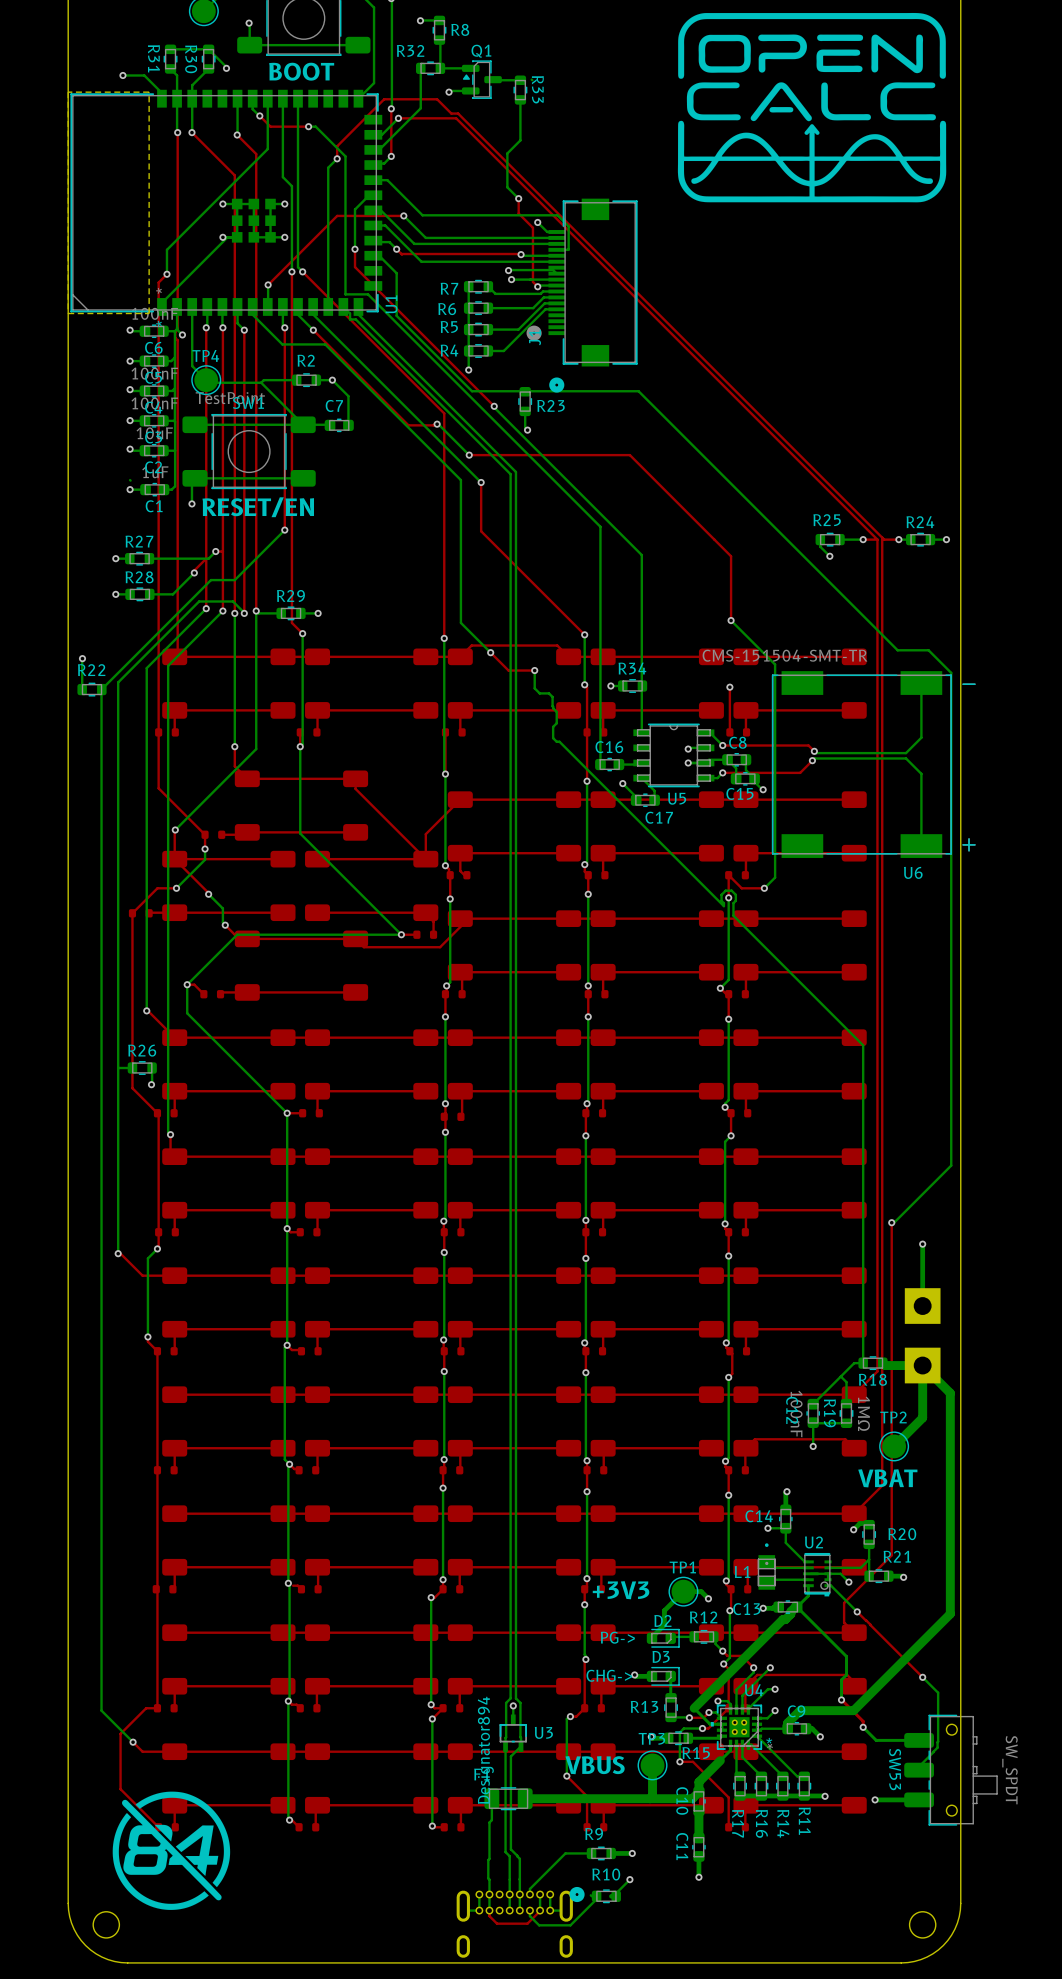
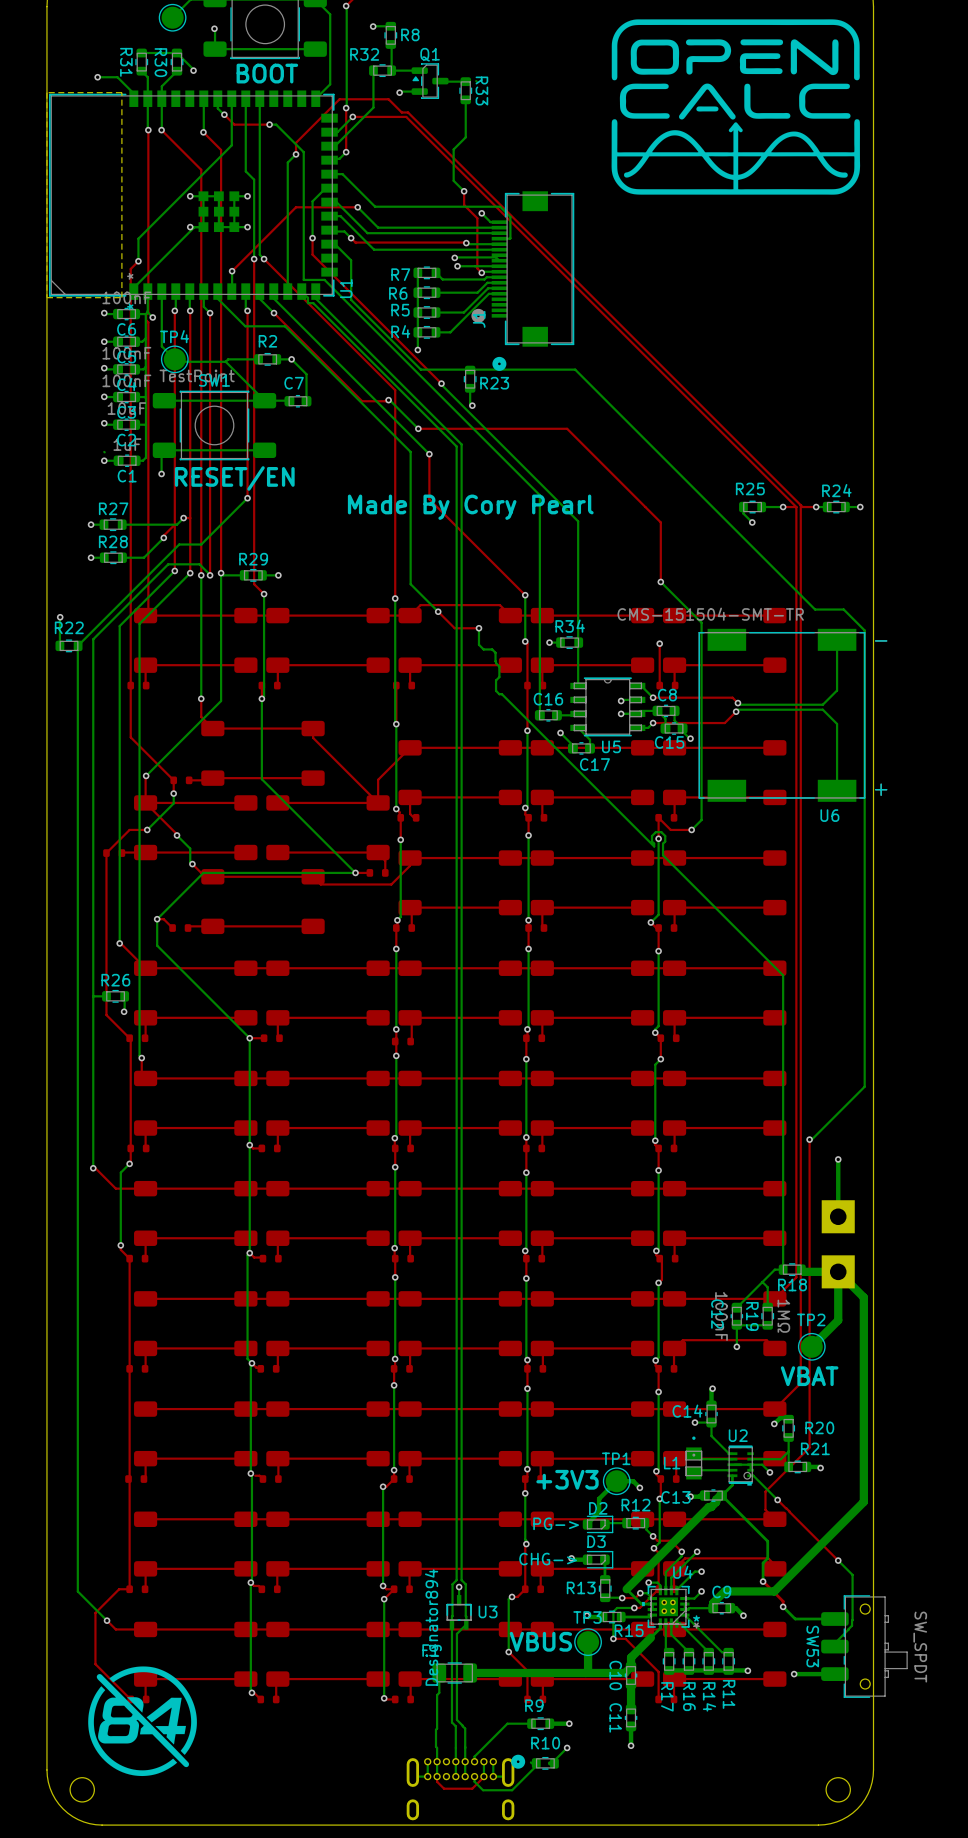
text: none -> Made By Cory Pearl (470, 507)

